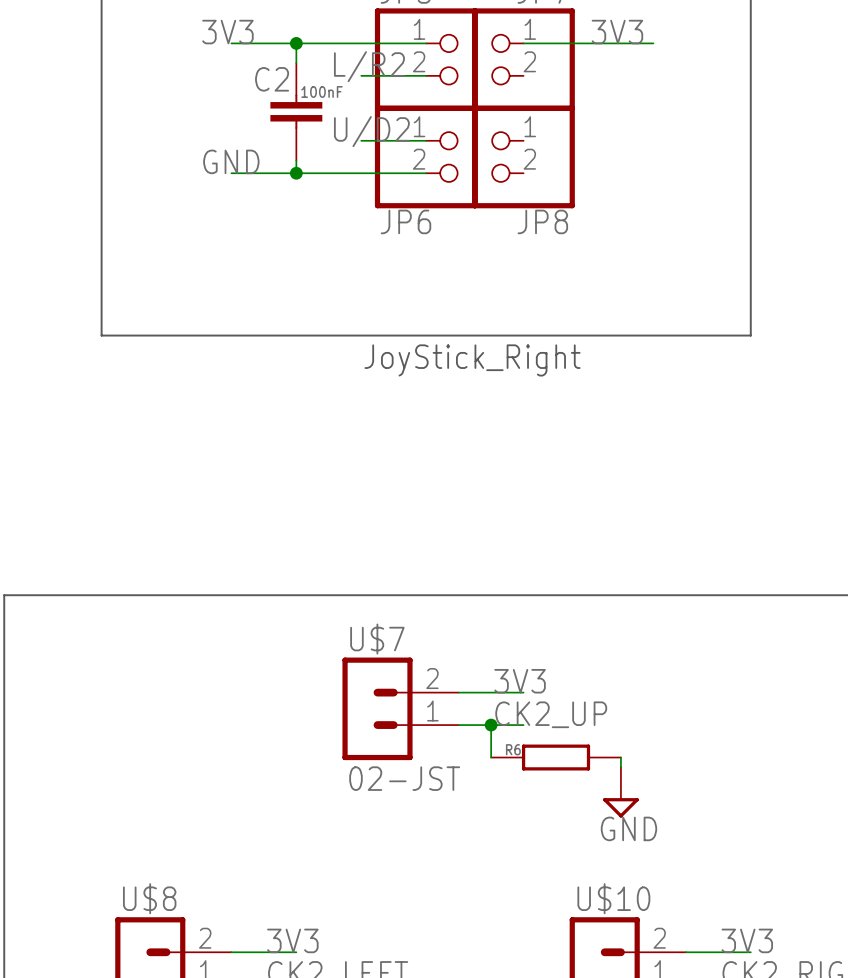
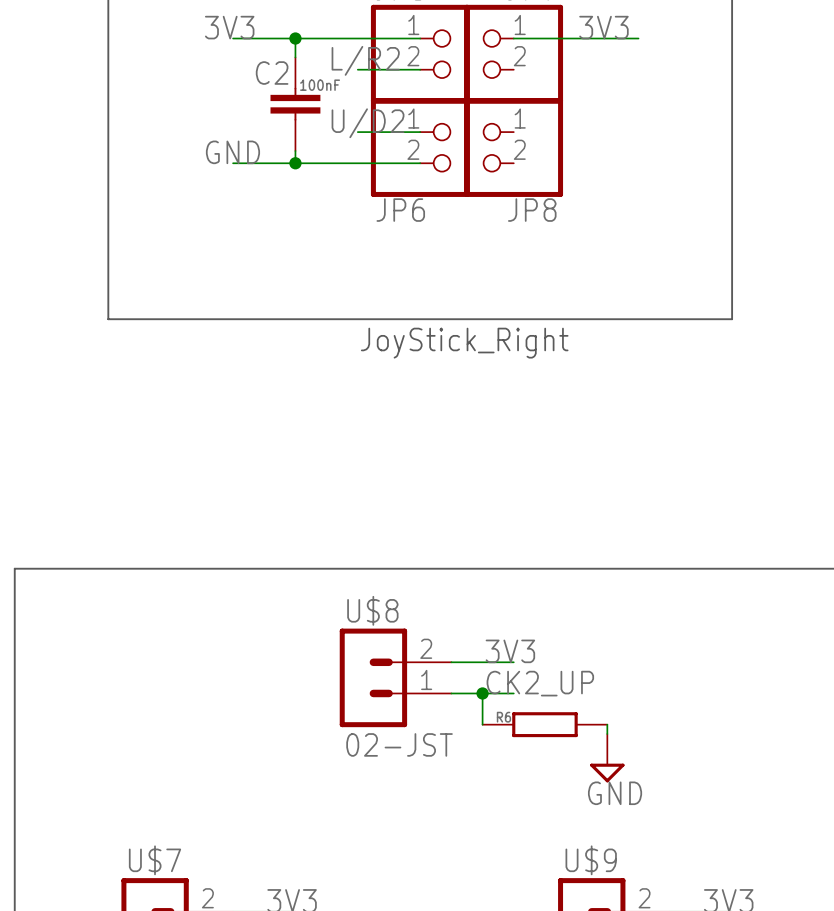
U$7 name: U$7 (377, 639) -> U$8 (372, 610)
U$8 name: U$8 (149, 898) -> U$7 (155, 860)
U$10 name: U$10 (613, 898) -> U$9 (591, 860)

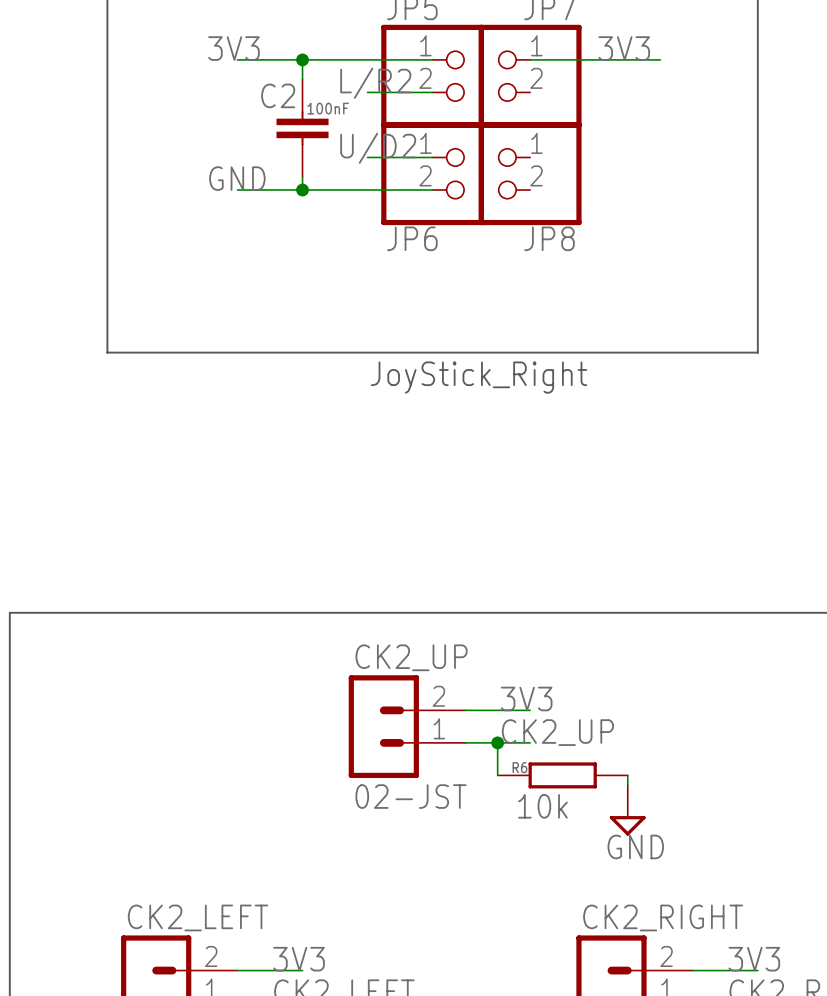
U$8 name: U$8 (372, 610) -> CK2_UP (411, 657)
R6 value: none -> 10k (542, 806)
U$7 name: U$7 (155, 860) -> CK2_LEFT (198, 917)
U$9 name: U$9 (591, 860) -> CK2_RIGHT (663, 917)

